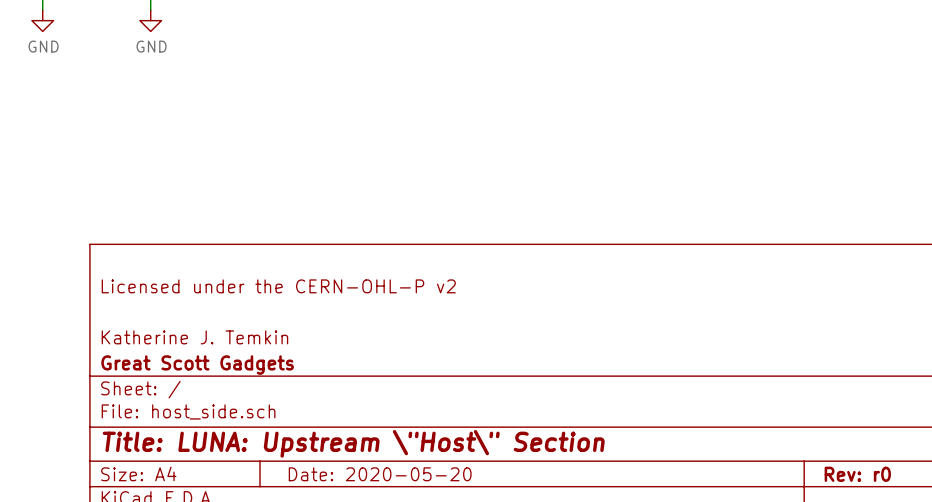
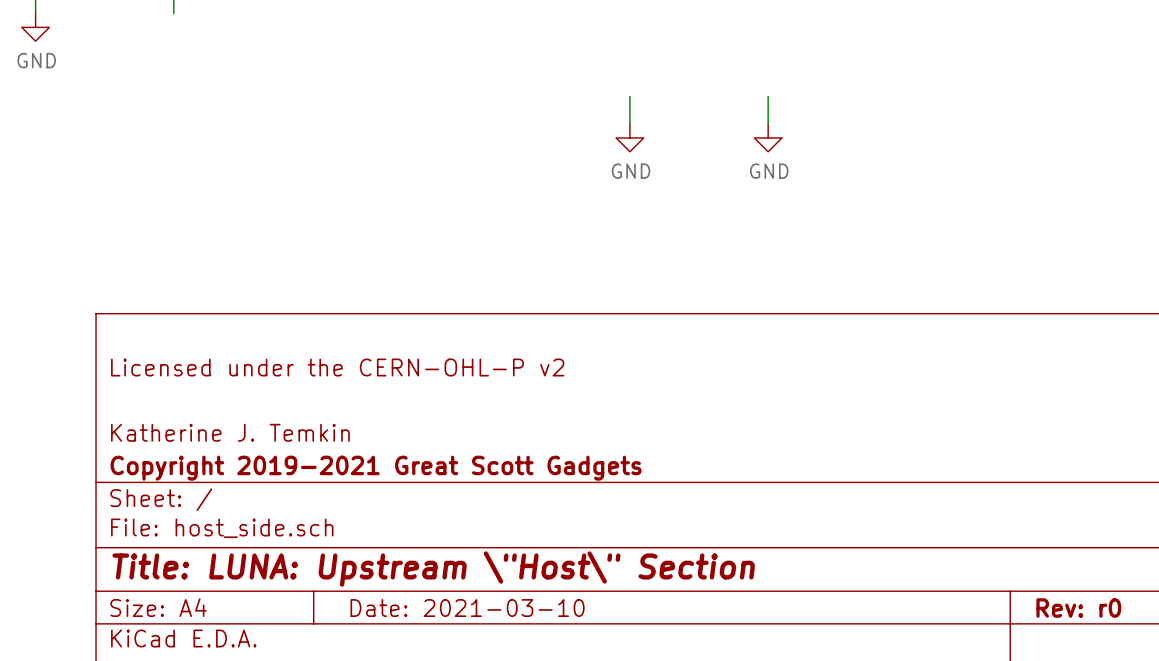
power symbol: GND (150, 20) -> none
wire: none -> (629, 96) (629, 124)
wire: none -> (768, 96) (768, 124)
power symbol: none -> GND (629, 137)
power symbol: none -> GND (768, 137)
title block: Great Scott Gadgets (197, 365) -> Copyright 2019-2021 Great Scott Gadgets (376, 468)
title block: Date: 2020-05-20 (380, 474) -> Date: 2021-03-10 (467, 608)

